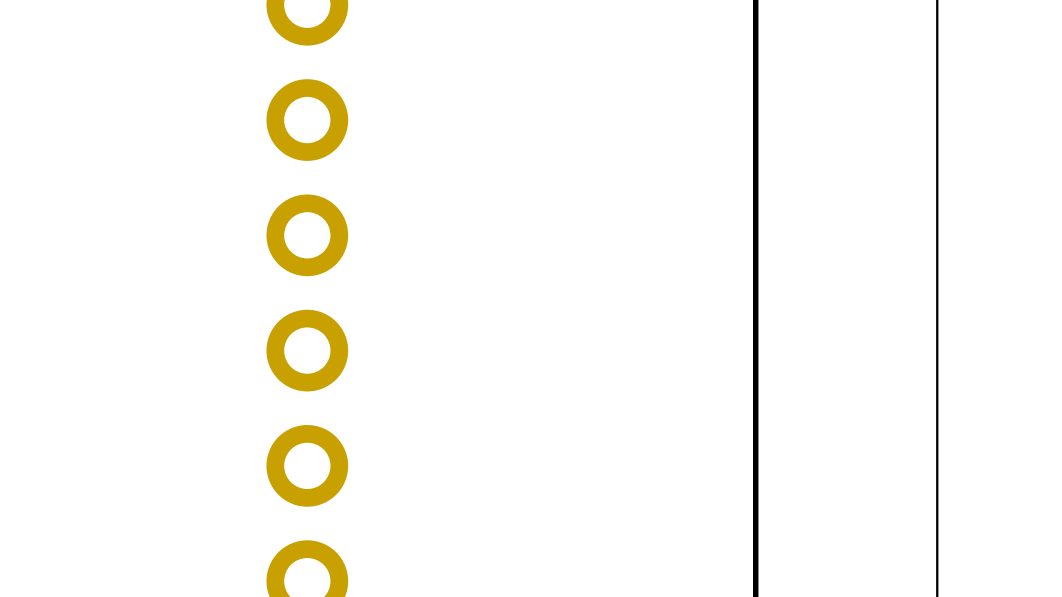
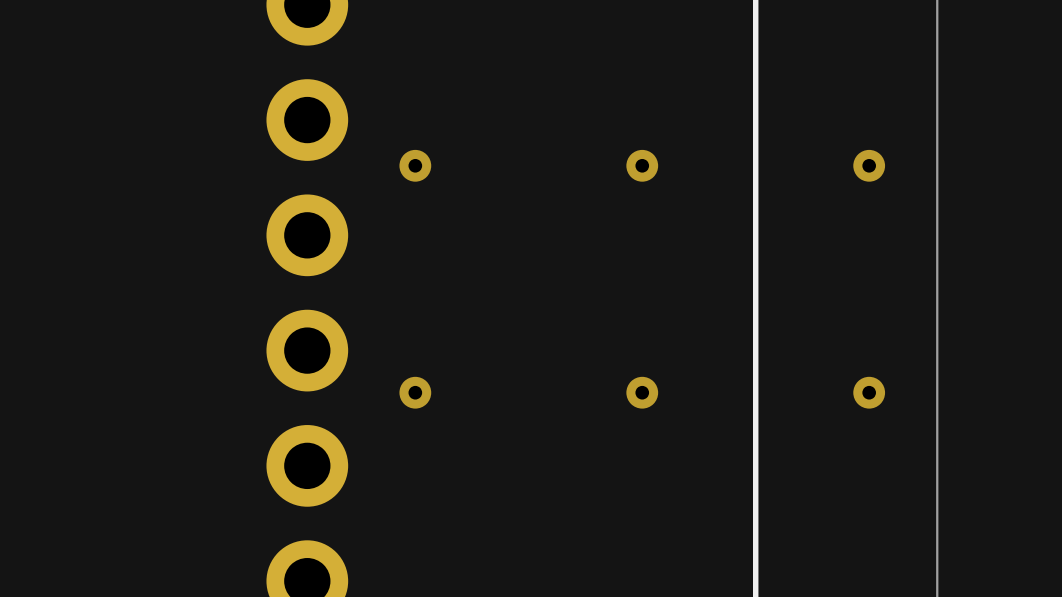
via: none -> (415, 165)
via: none -> (642, 165)
via: none -> (869, 165)
via: none -> (415, 392)
via: none -> (642, 392)
via: none -> (869, 392)

